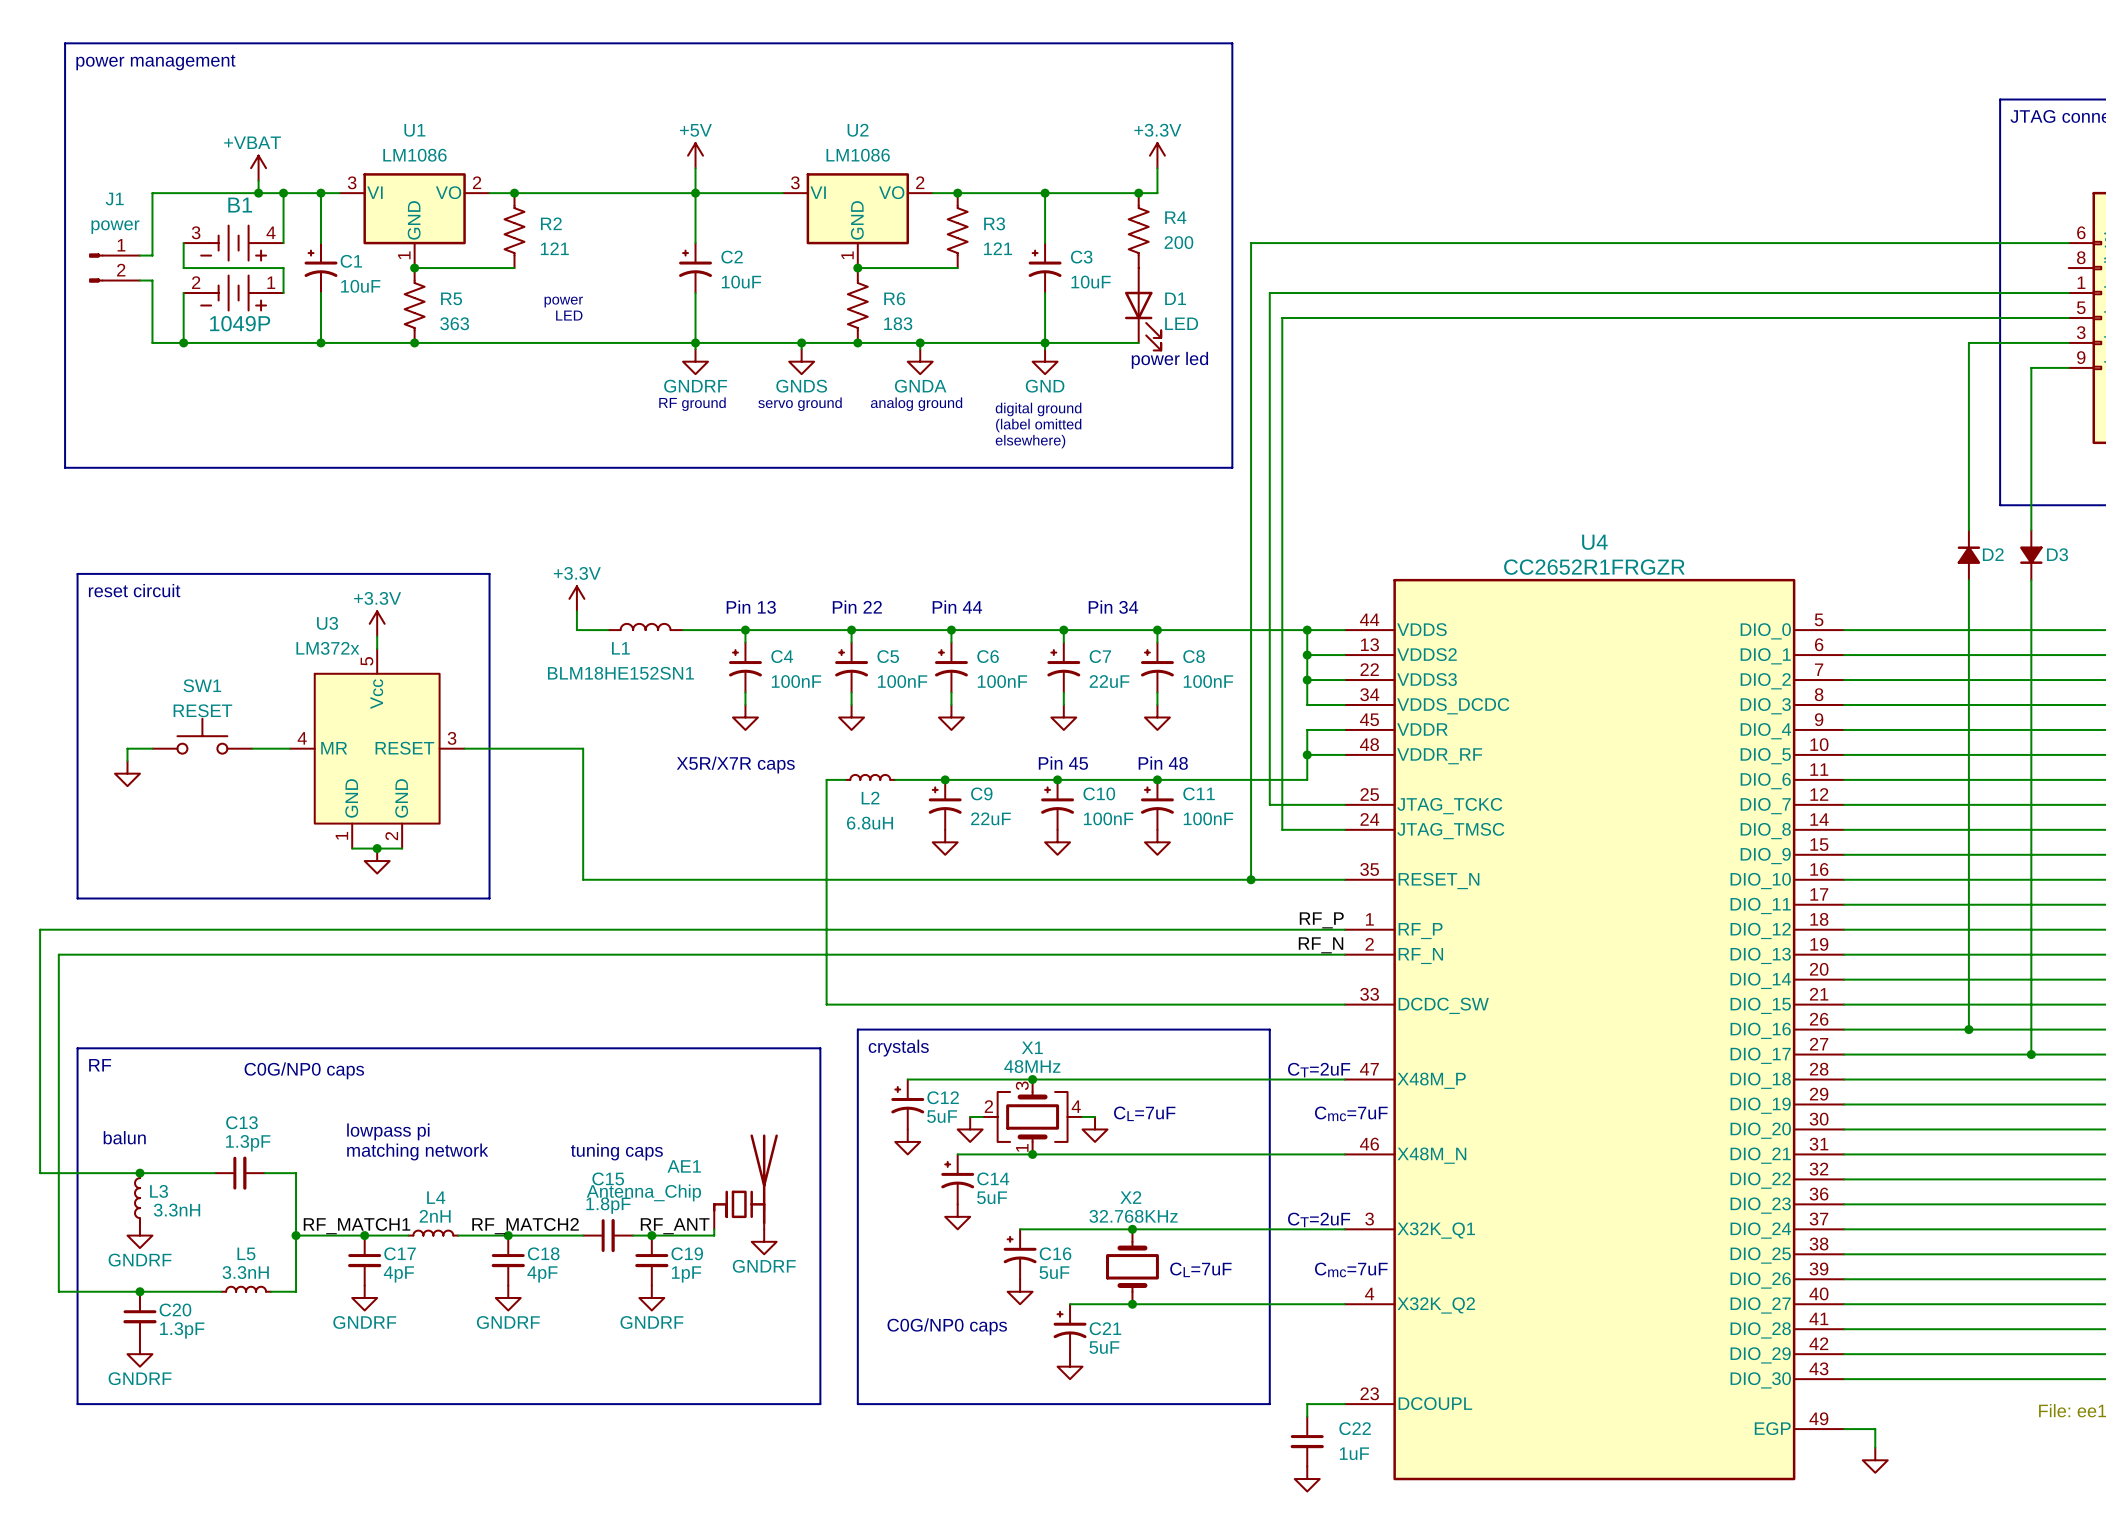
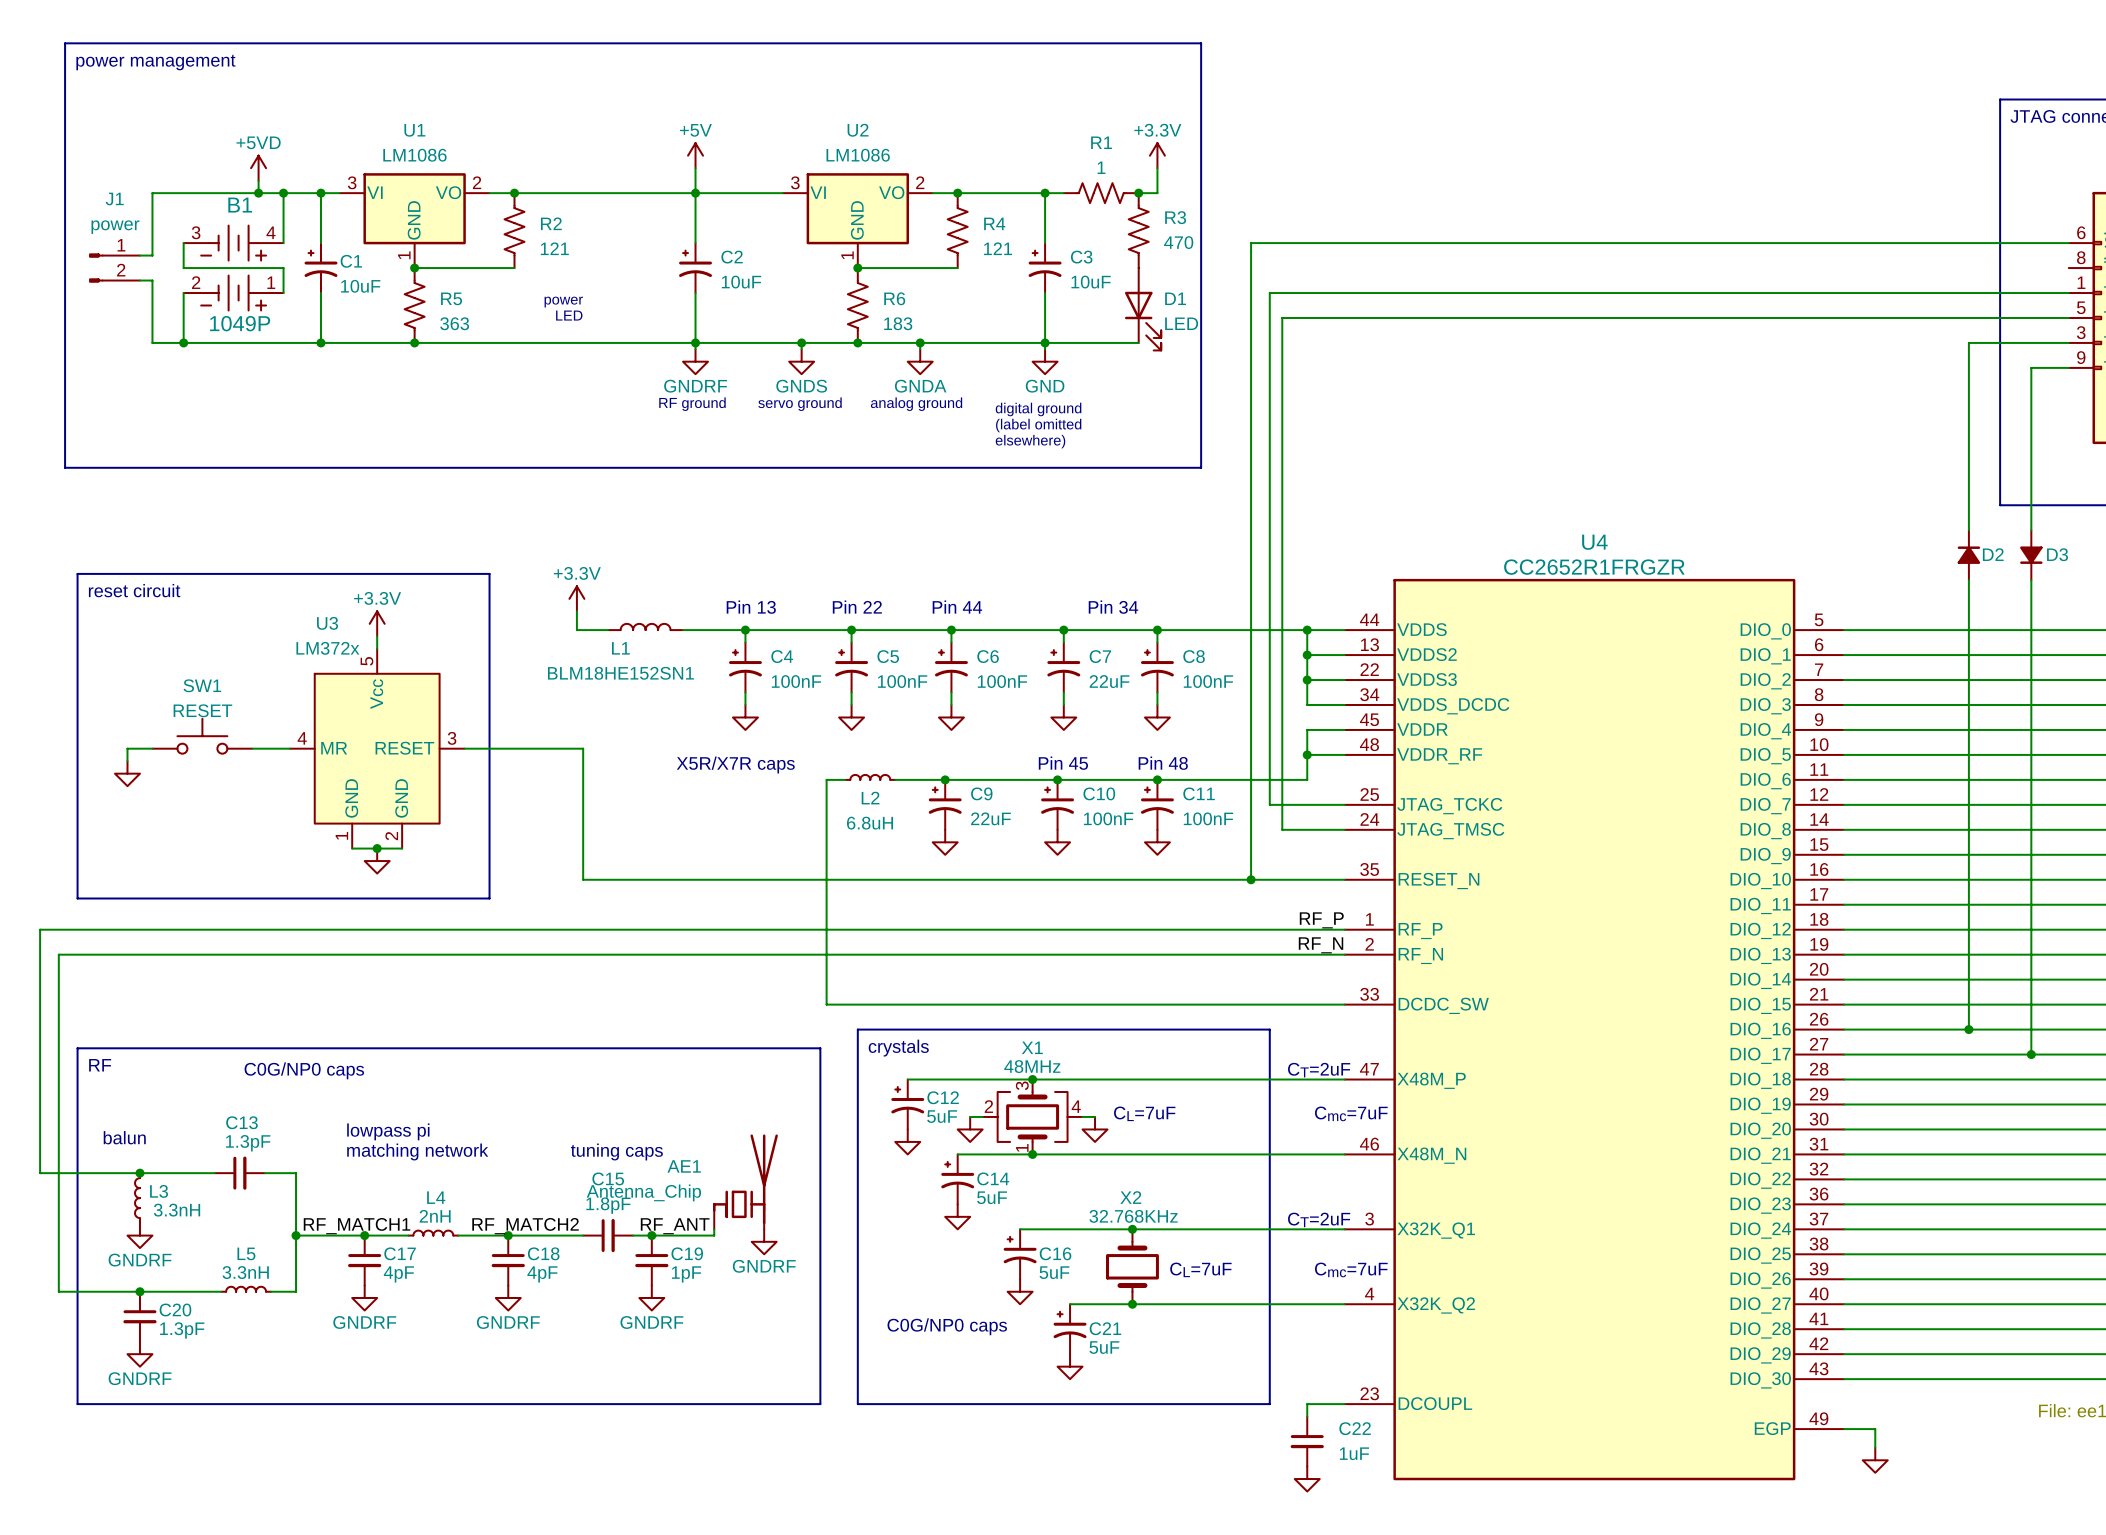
line: (1201, 43) (1232, 43) (1232, 467) (1201, 467) -> (1201, 43) (1201, 467)
power symbol: +VBAT (258, 168) -> +5VD (258, 168)
R1: none -> 1 (1101, 193)
R4 name: R4 (1175, 217) -> R3 (1175, 217)
R3 name: R3 (994, 223) -> R4 (994, 223)
R4 value: 200 (1178, 242) -> 470 (1178, 242)
text: power led (1169, 360) -> none

